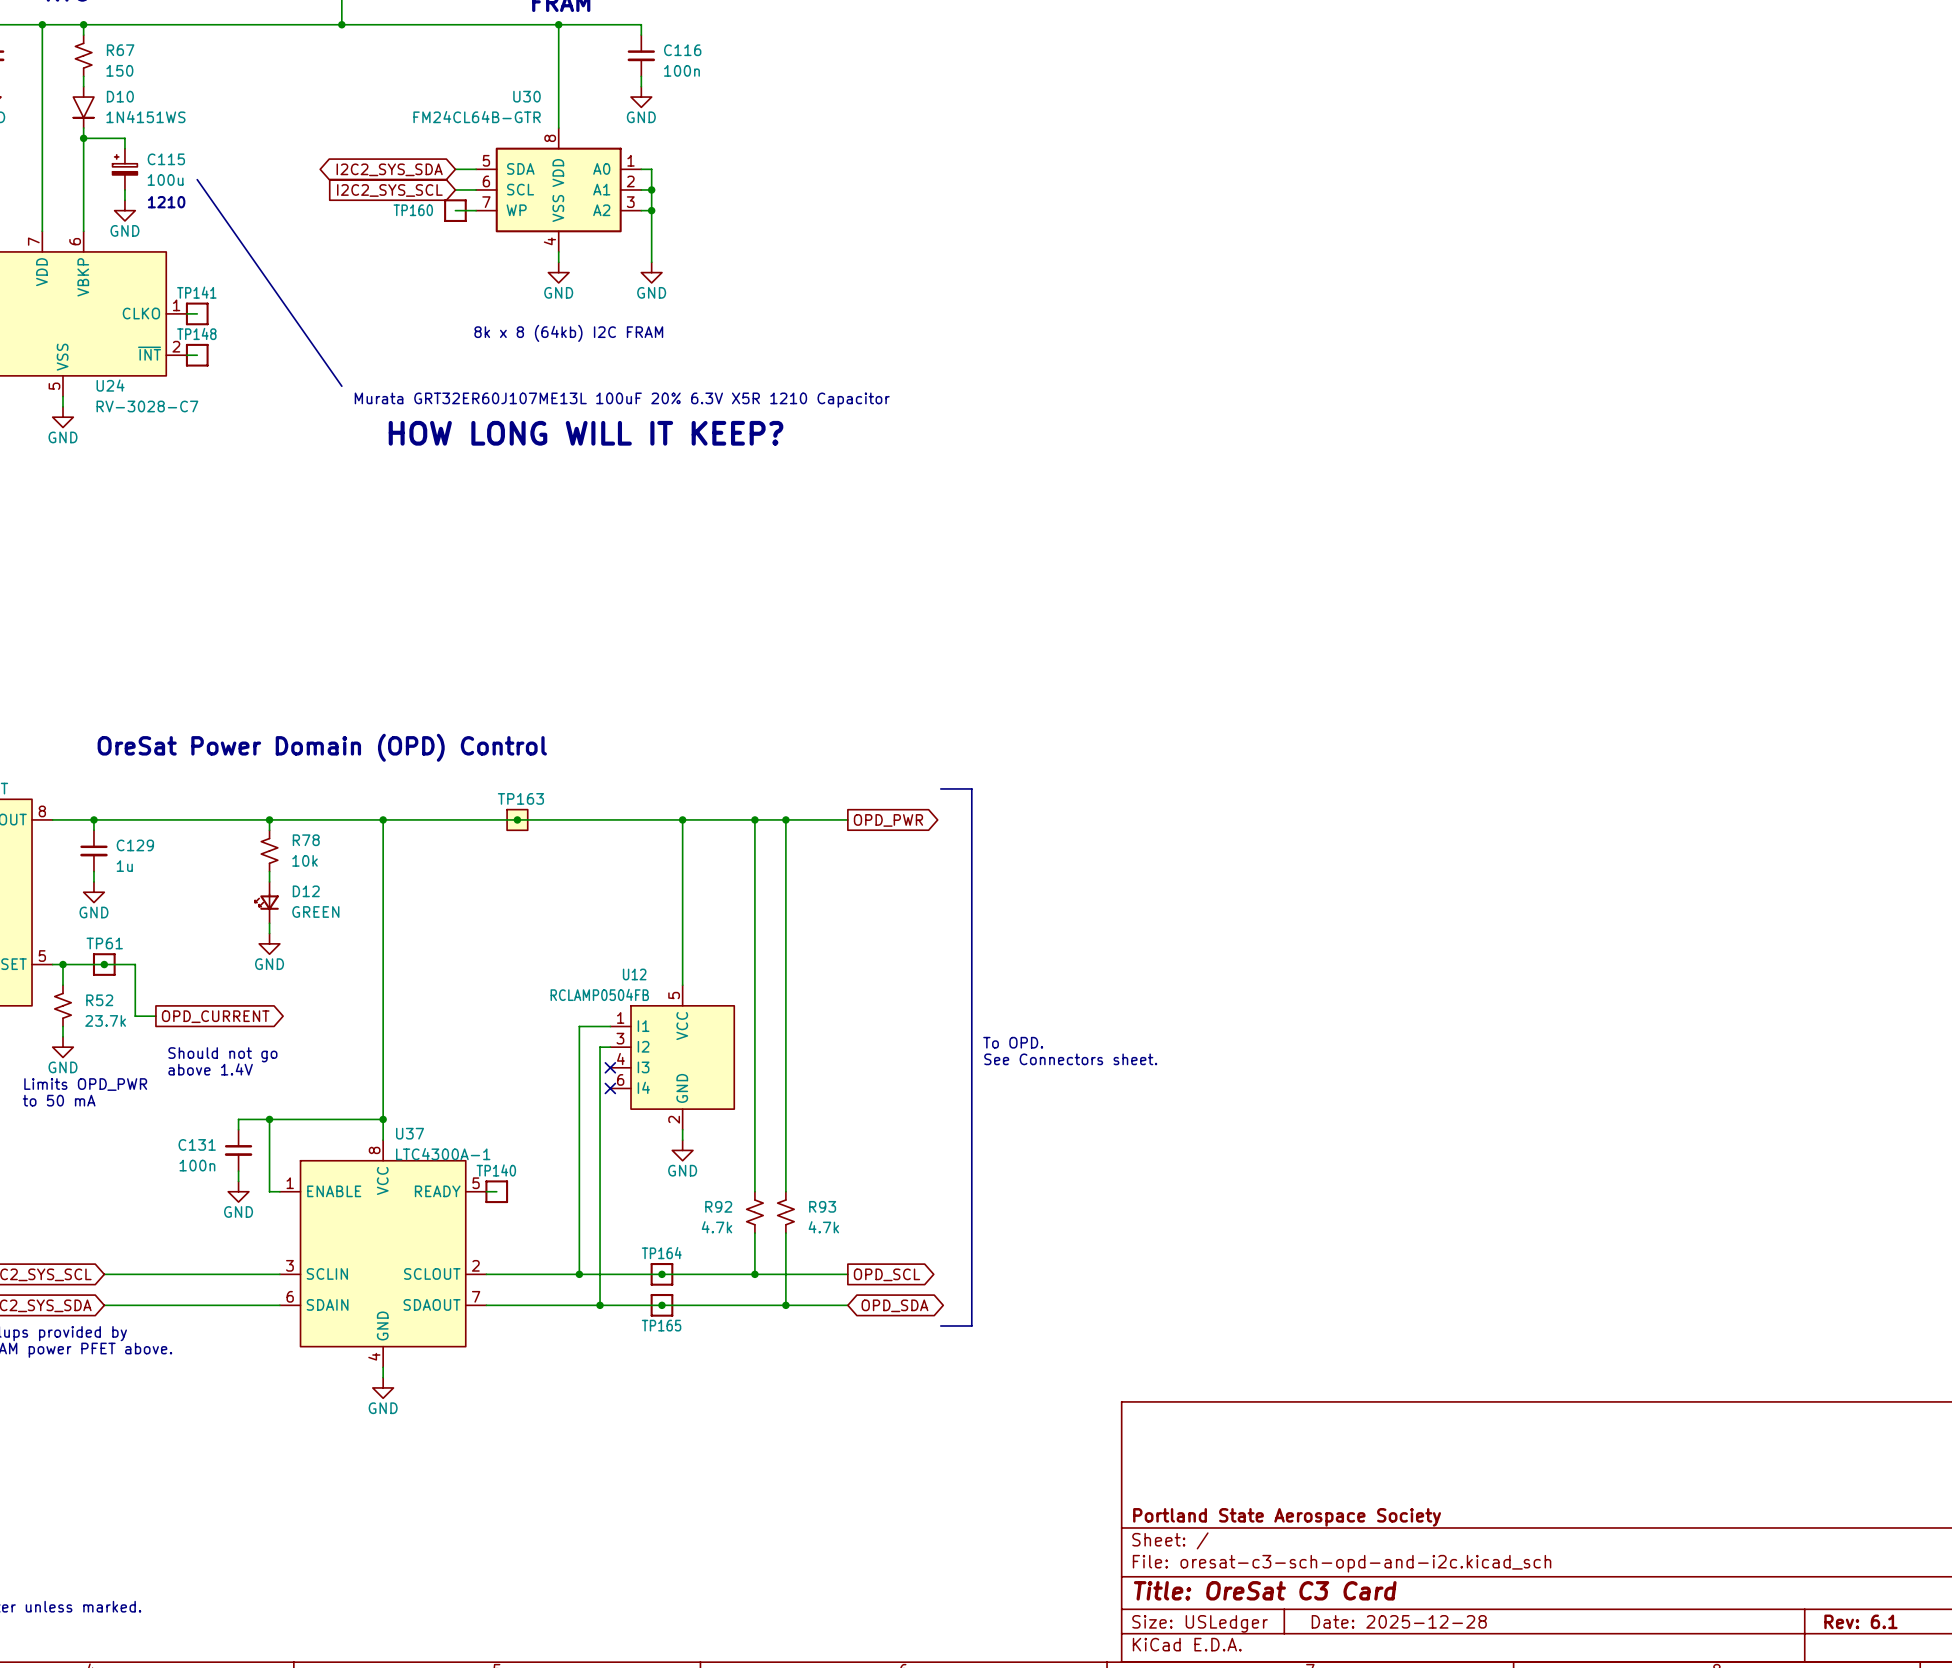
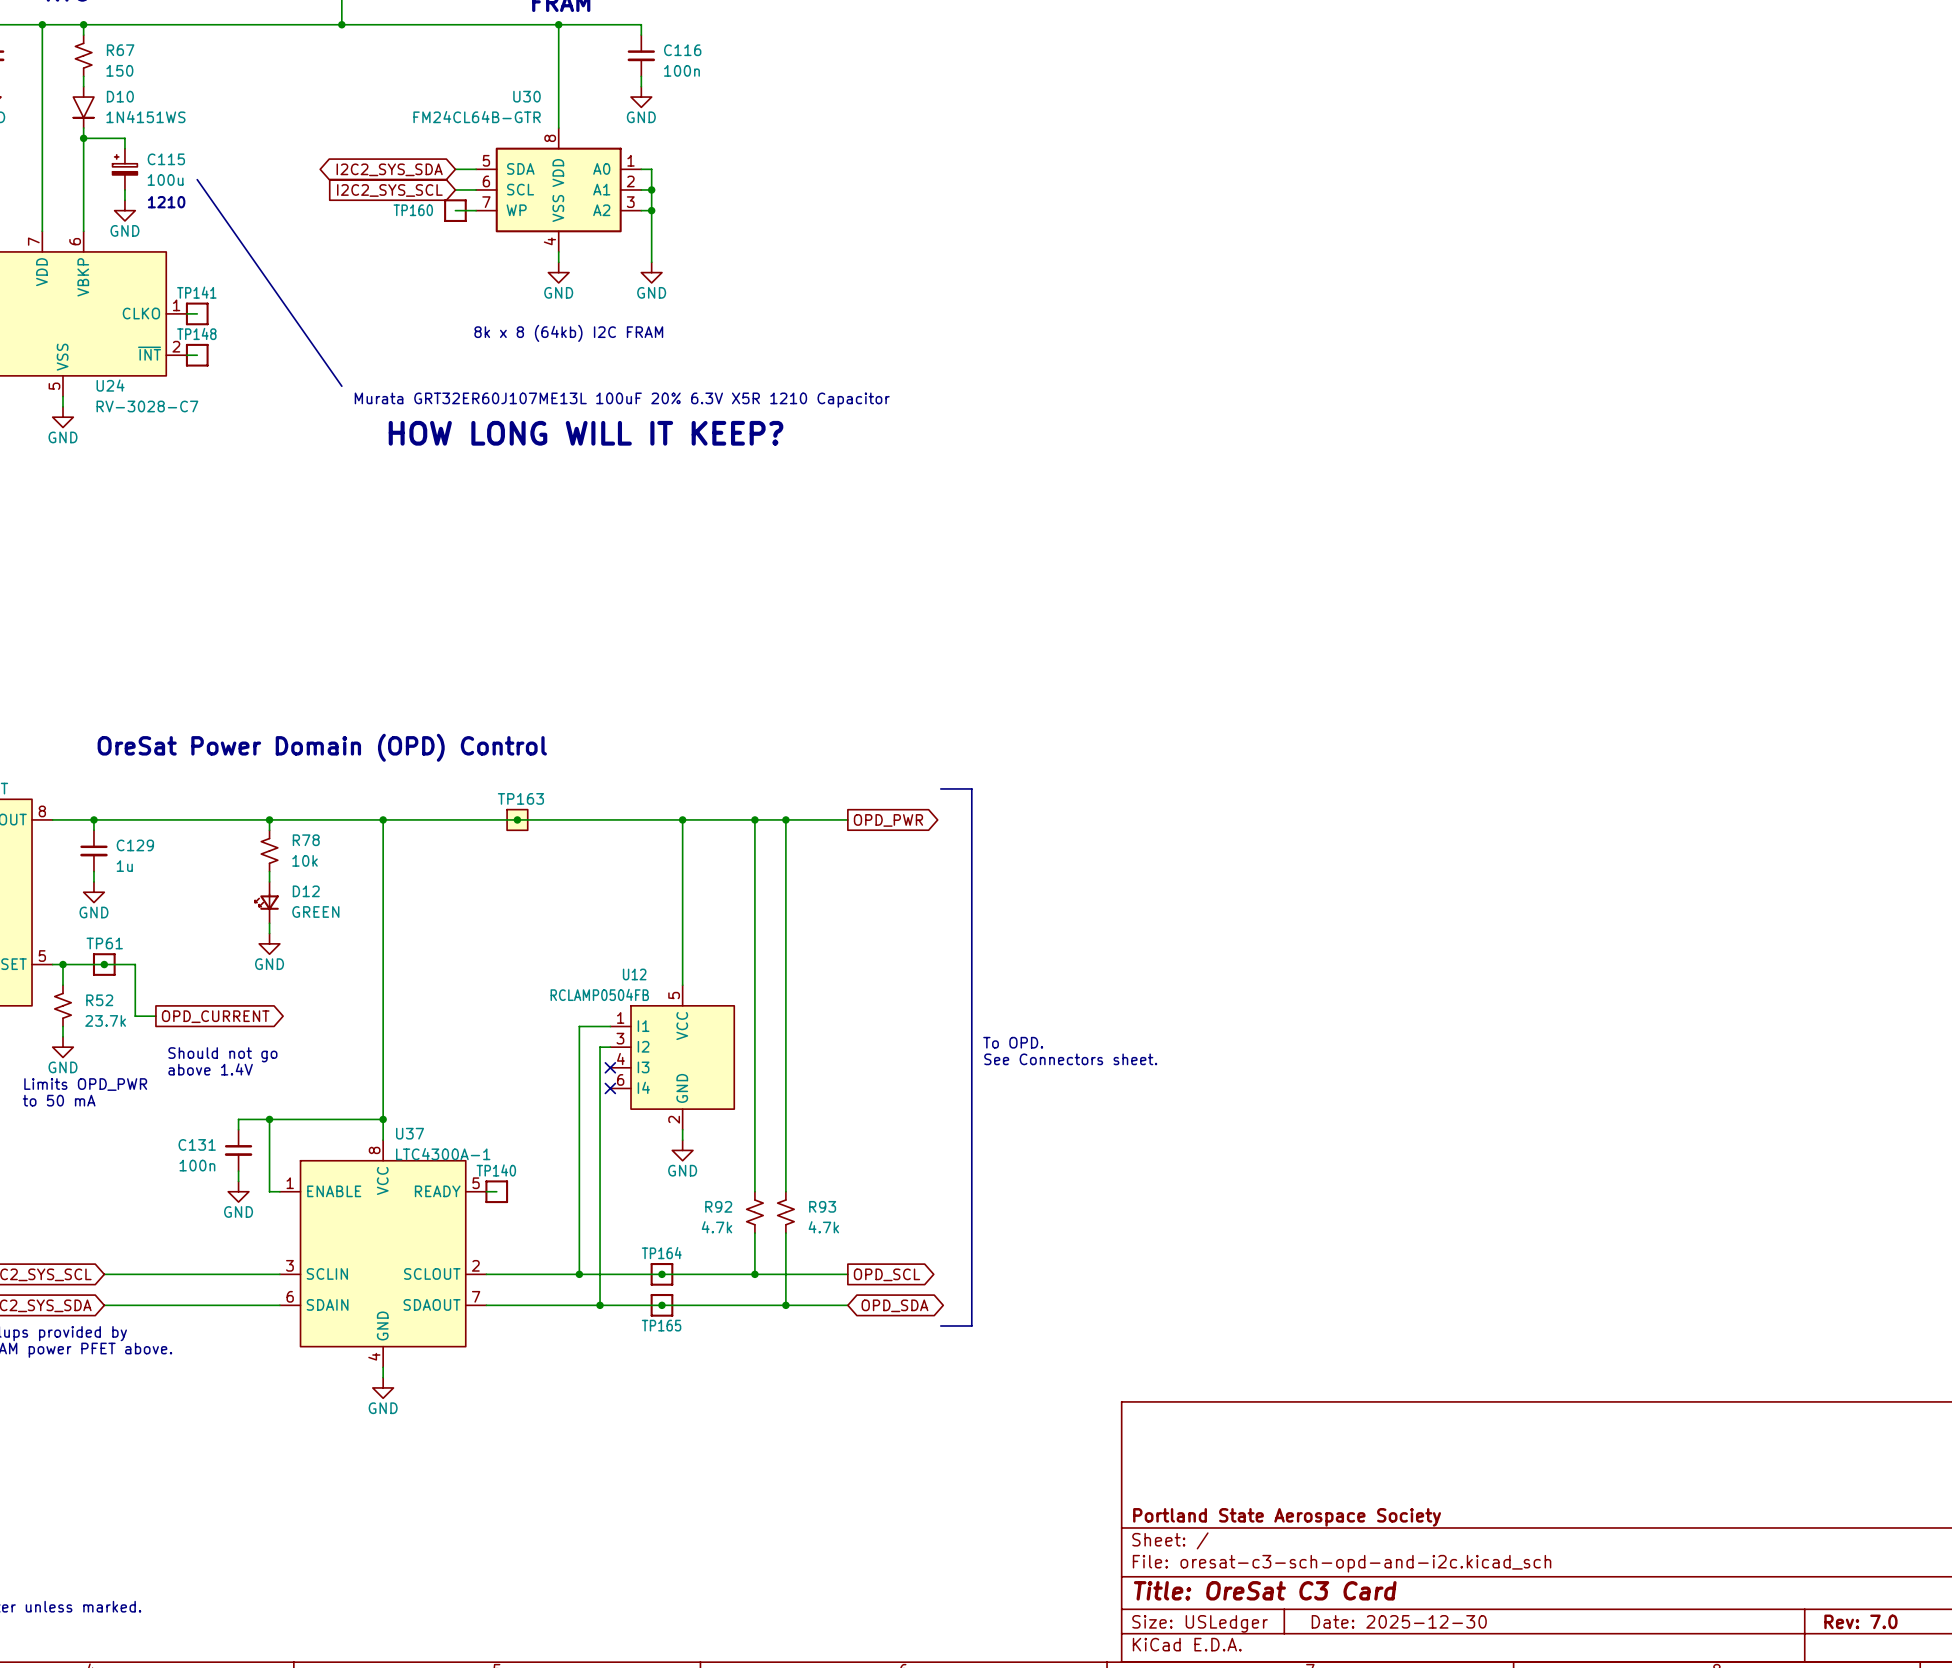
title block: Date: 2025-12-28 (1399, 1621) -> Date: 2025-12-30 (1399, 1621)
title block: Rev: 6.1 (1860, 1621) -> Rev: 7.0 (1860, 1621)

